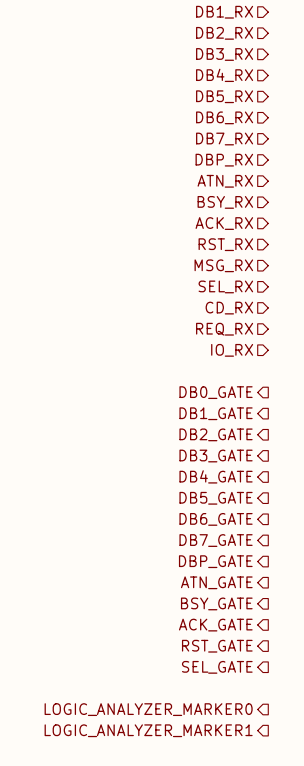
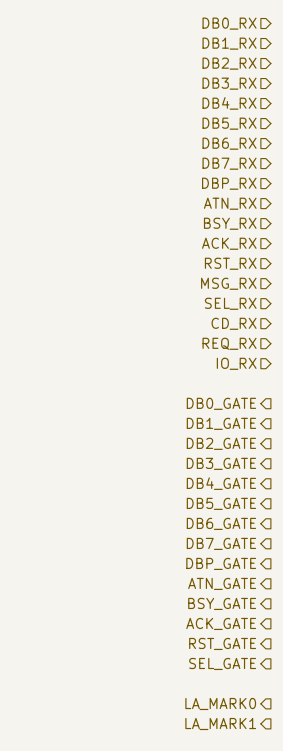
hierarchical label: LOGIC_ANALYZER_MARKER0 (148, 709) -> LA_MARK0 (220, 703)
hierarchical label: LOGIC_ANALYZER_MARKER1 (148, 730) -> LA_MARK1 (220, 724)

